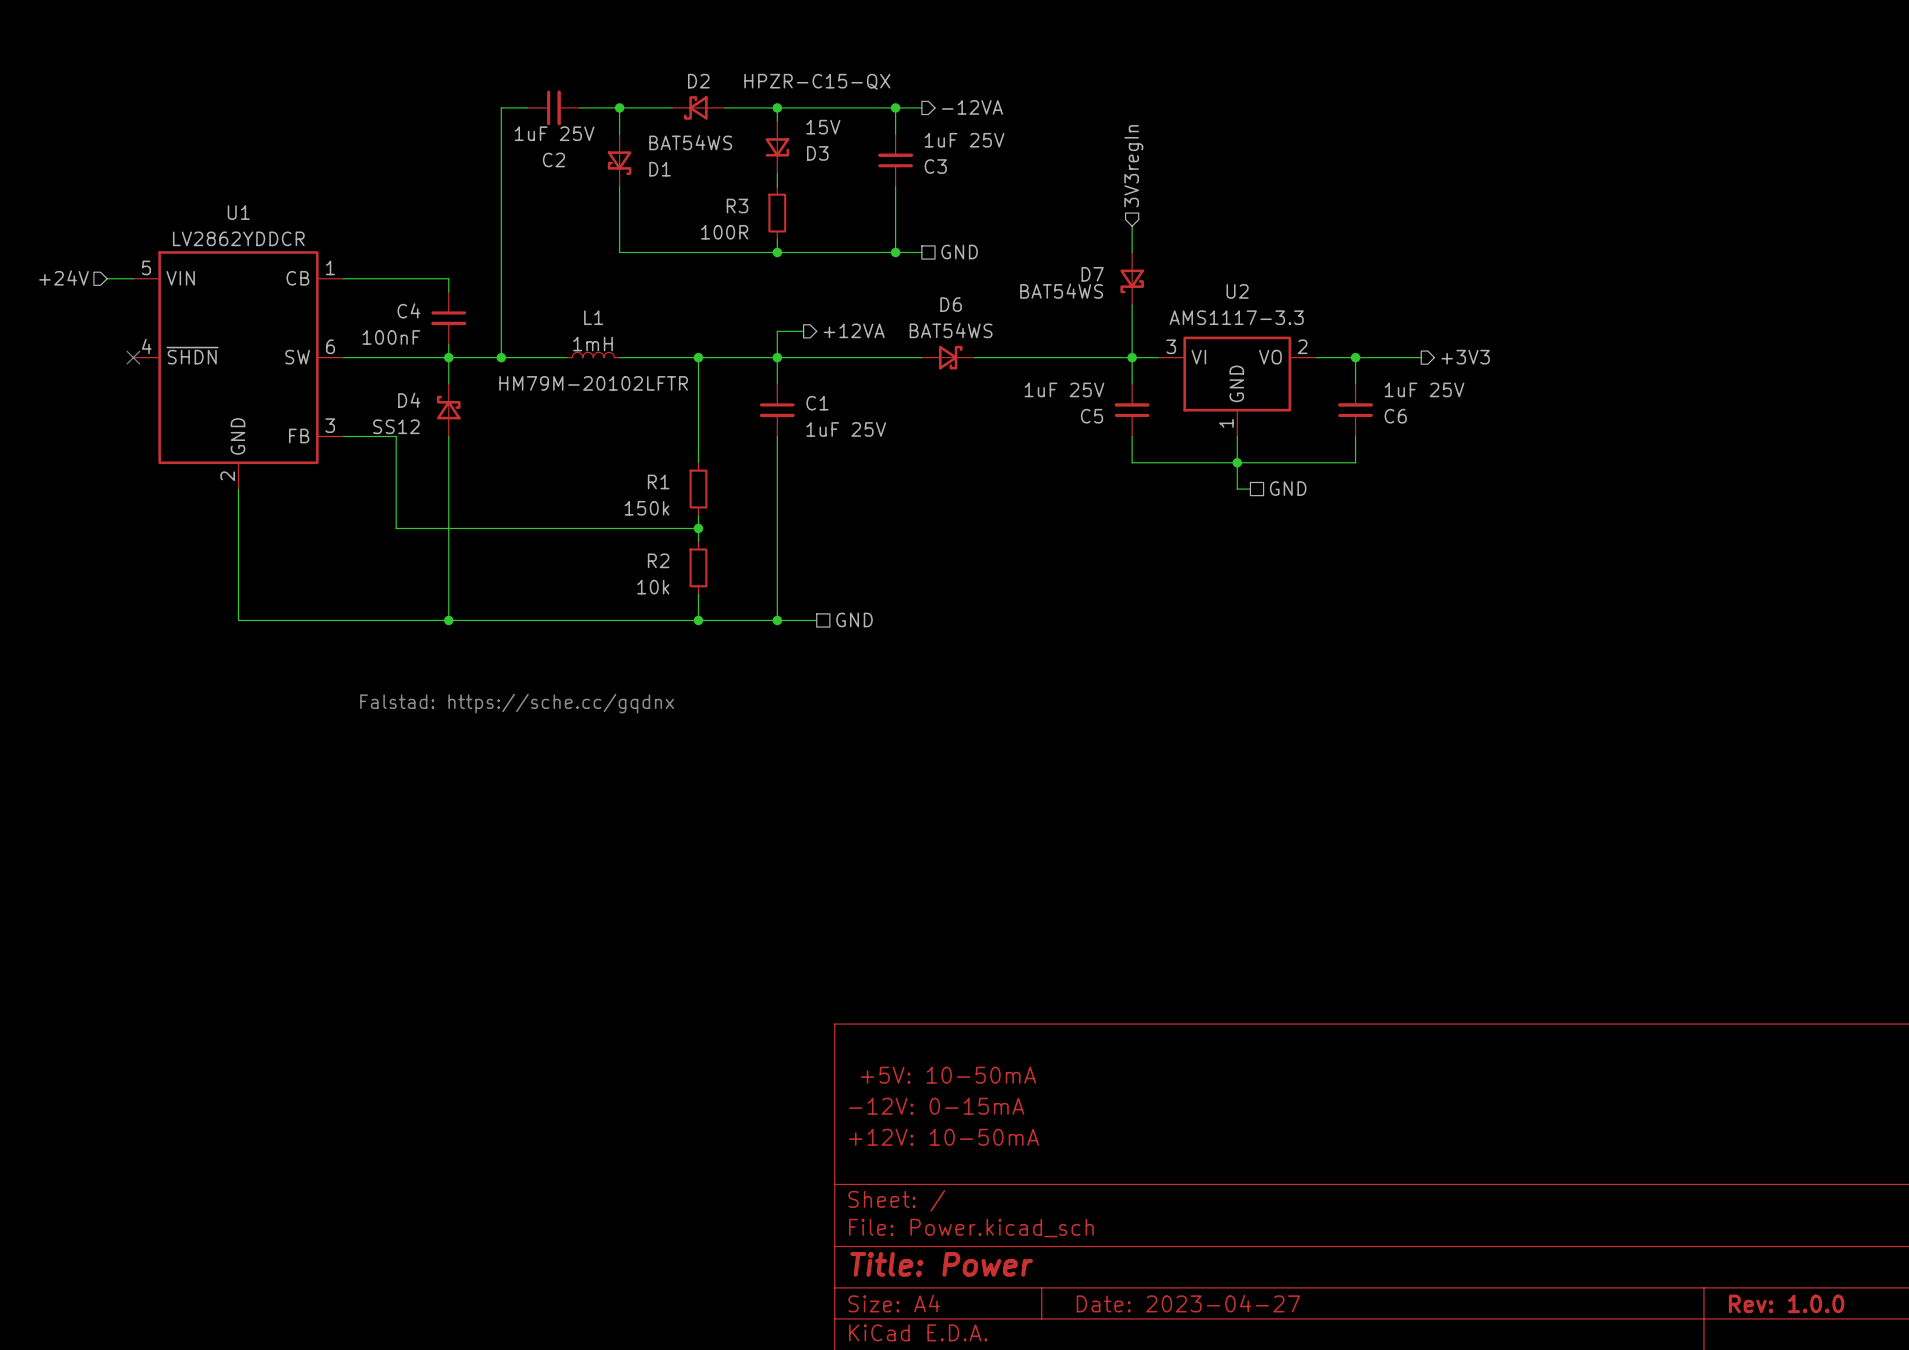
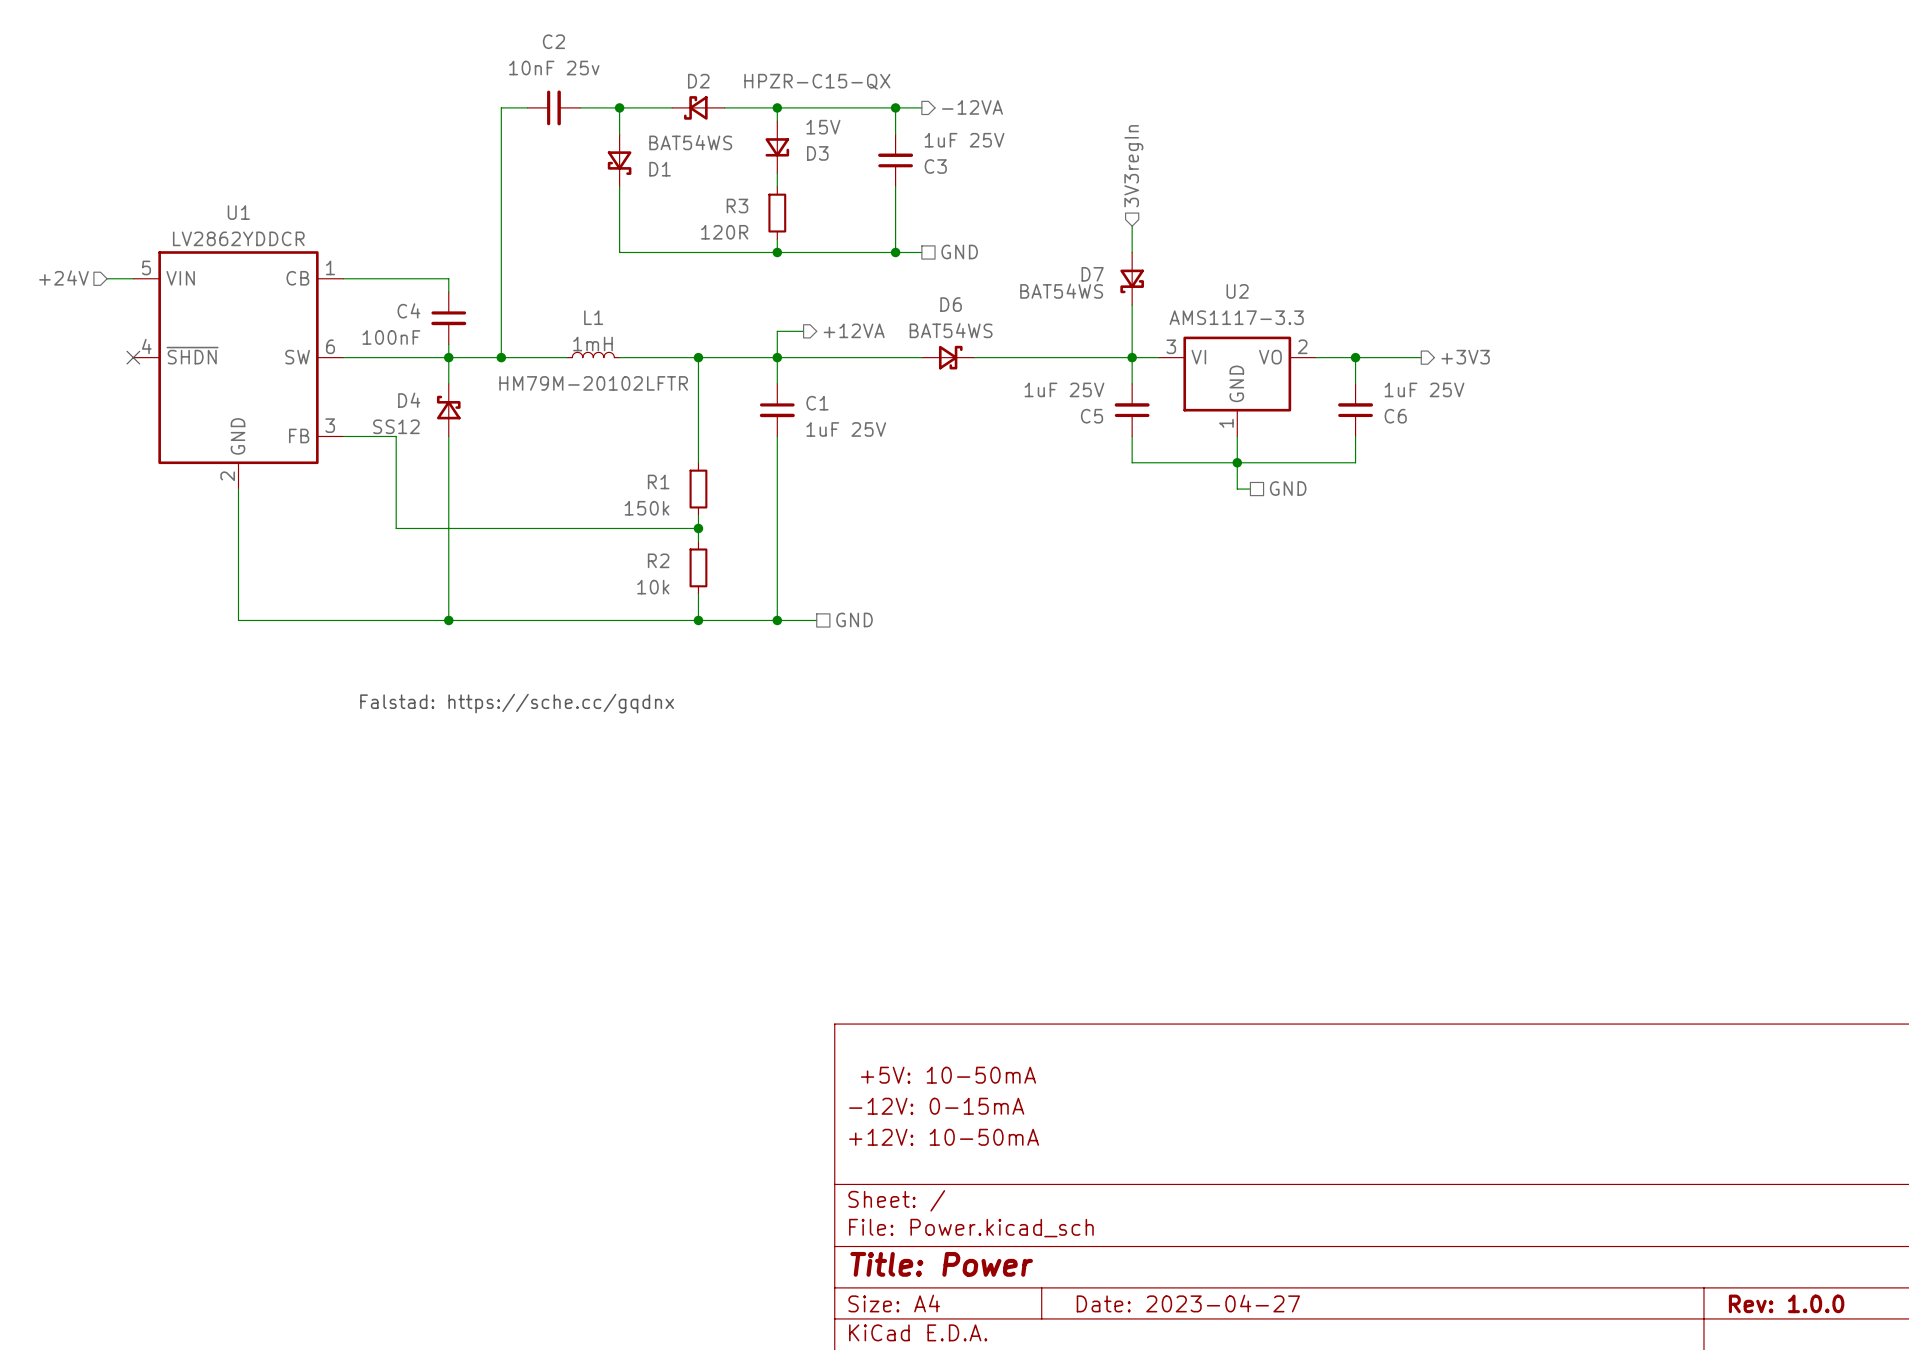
C2 value: 1uF 25V (554, 133) -> 10nF 25v (554, 68)
C2 name position: C2 (553, 160) -> C2 (553, 41)
R3 value: 100R (724, 232) -> 120R (724, 232)

